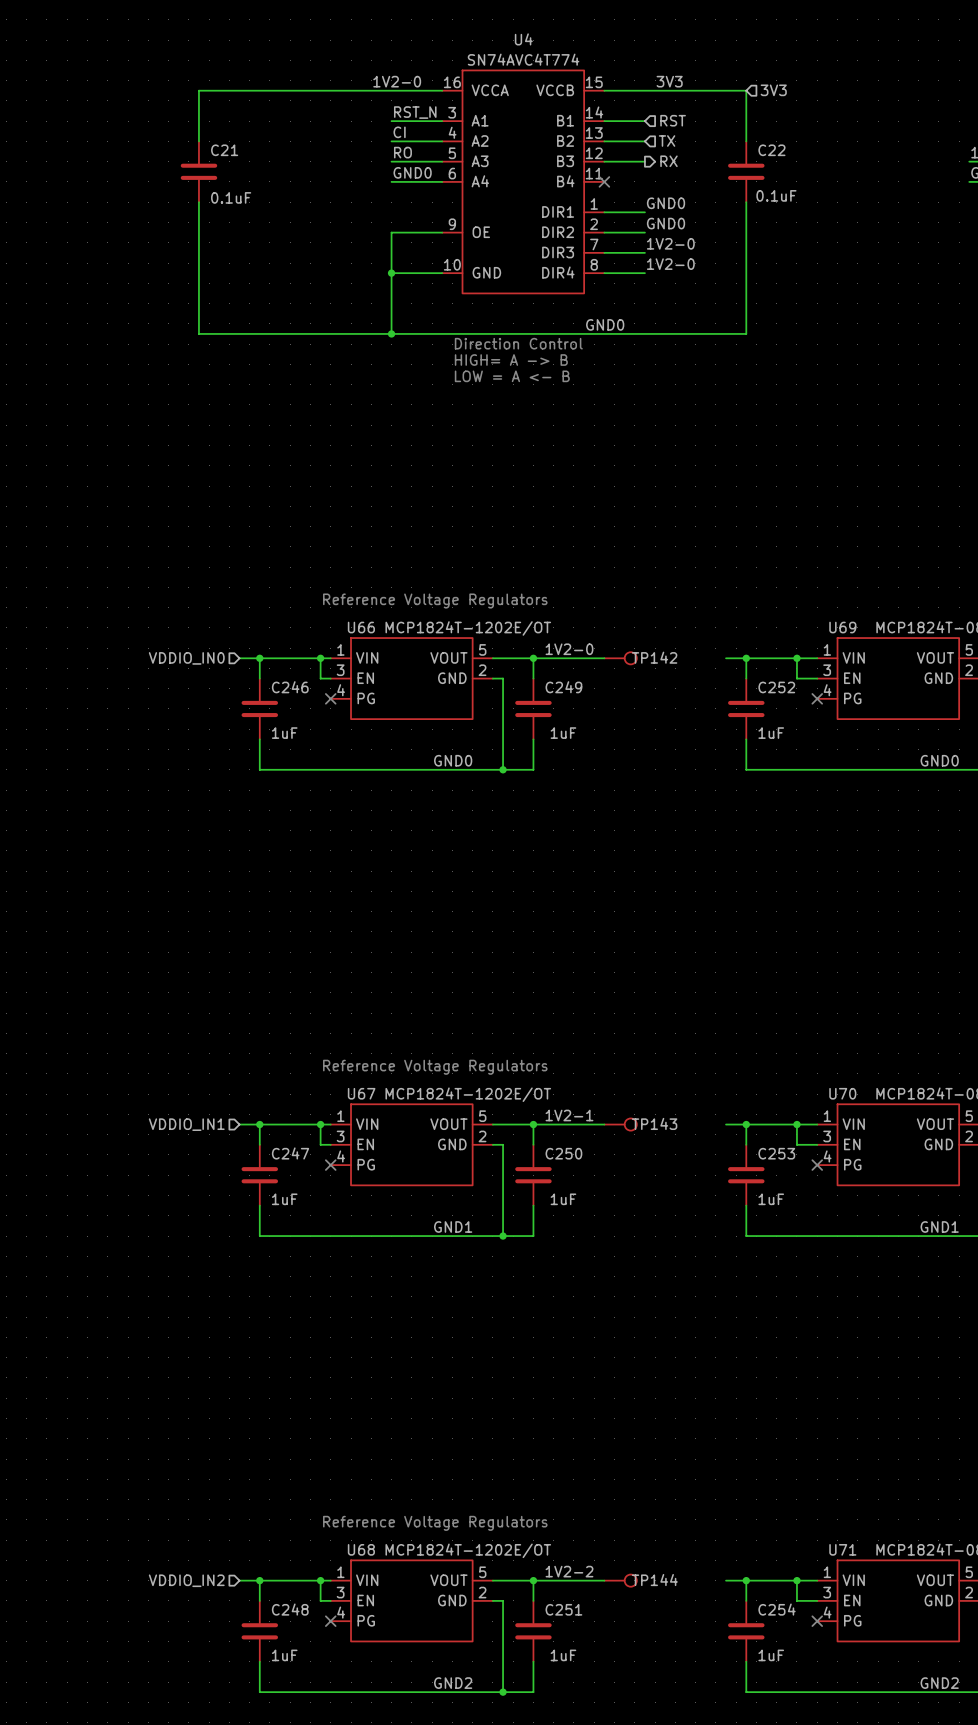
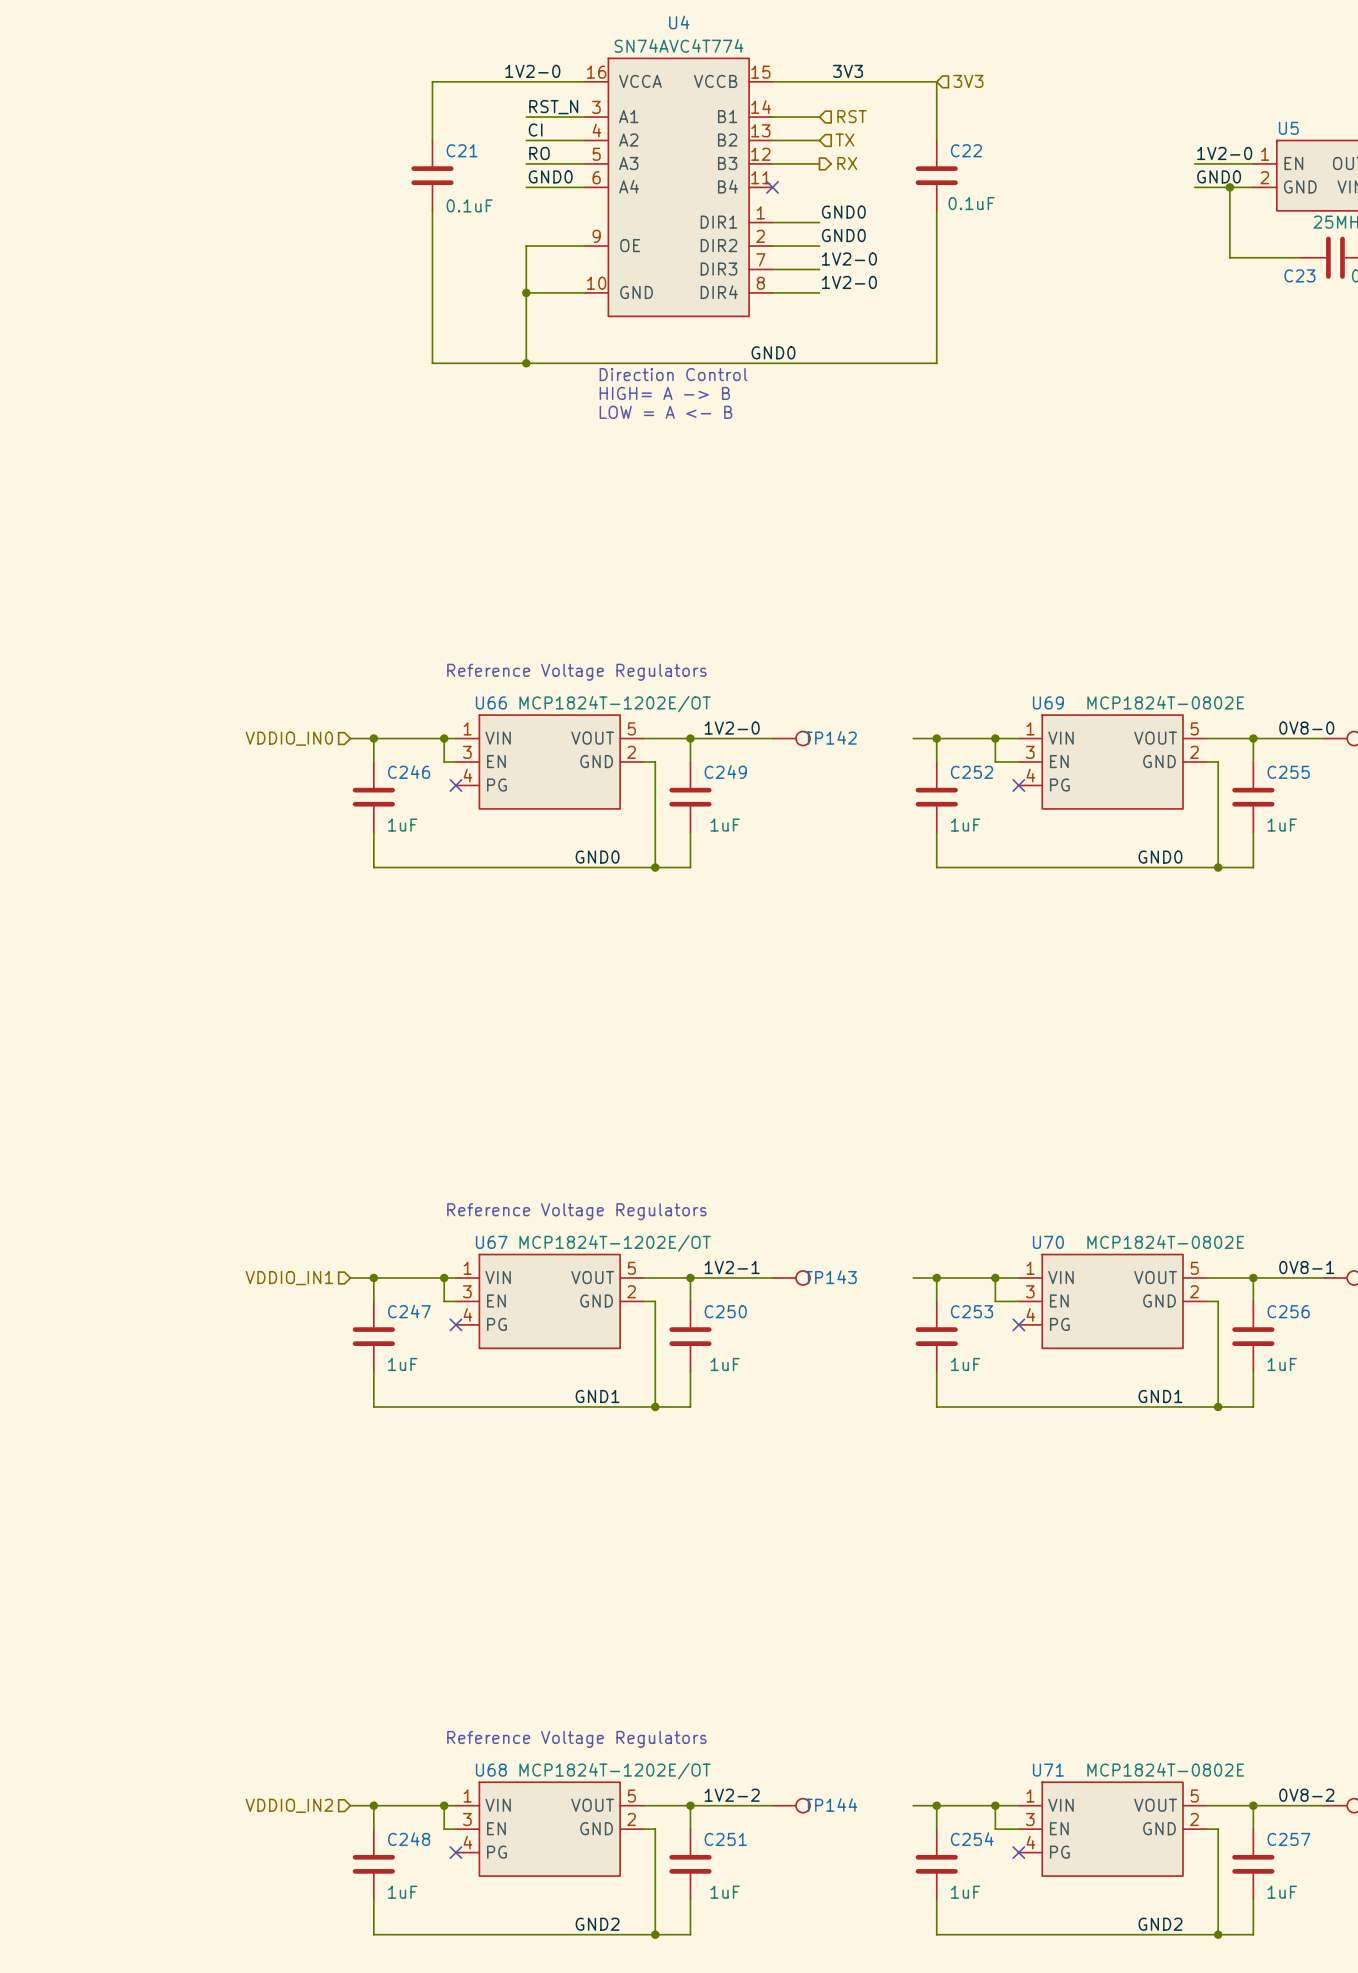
wire: (310, 90) (198, 90) (198, 141) -> (432, 81) (432, 140)
C21 position: (198, 171) -> (432, 175)
wire: (198, 202) (198, 333) (310, 333) -> (432, 210) (432, 363)

